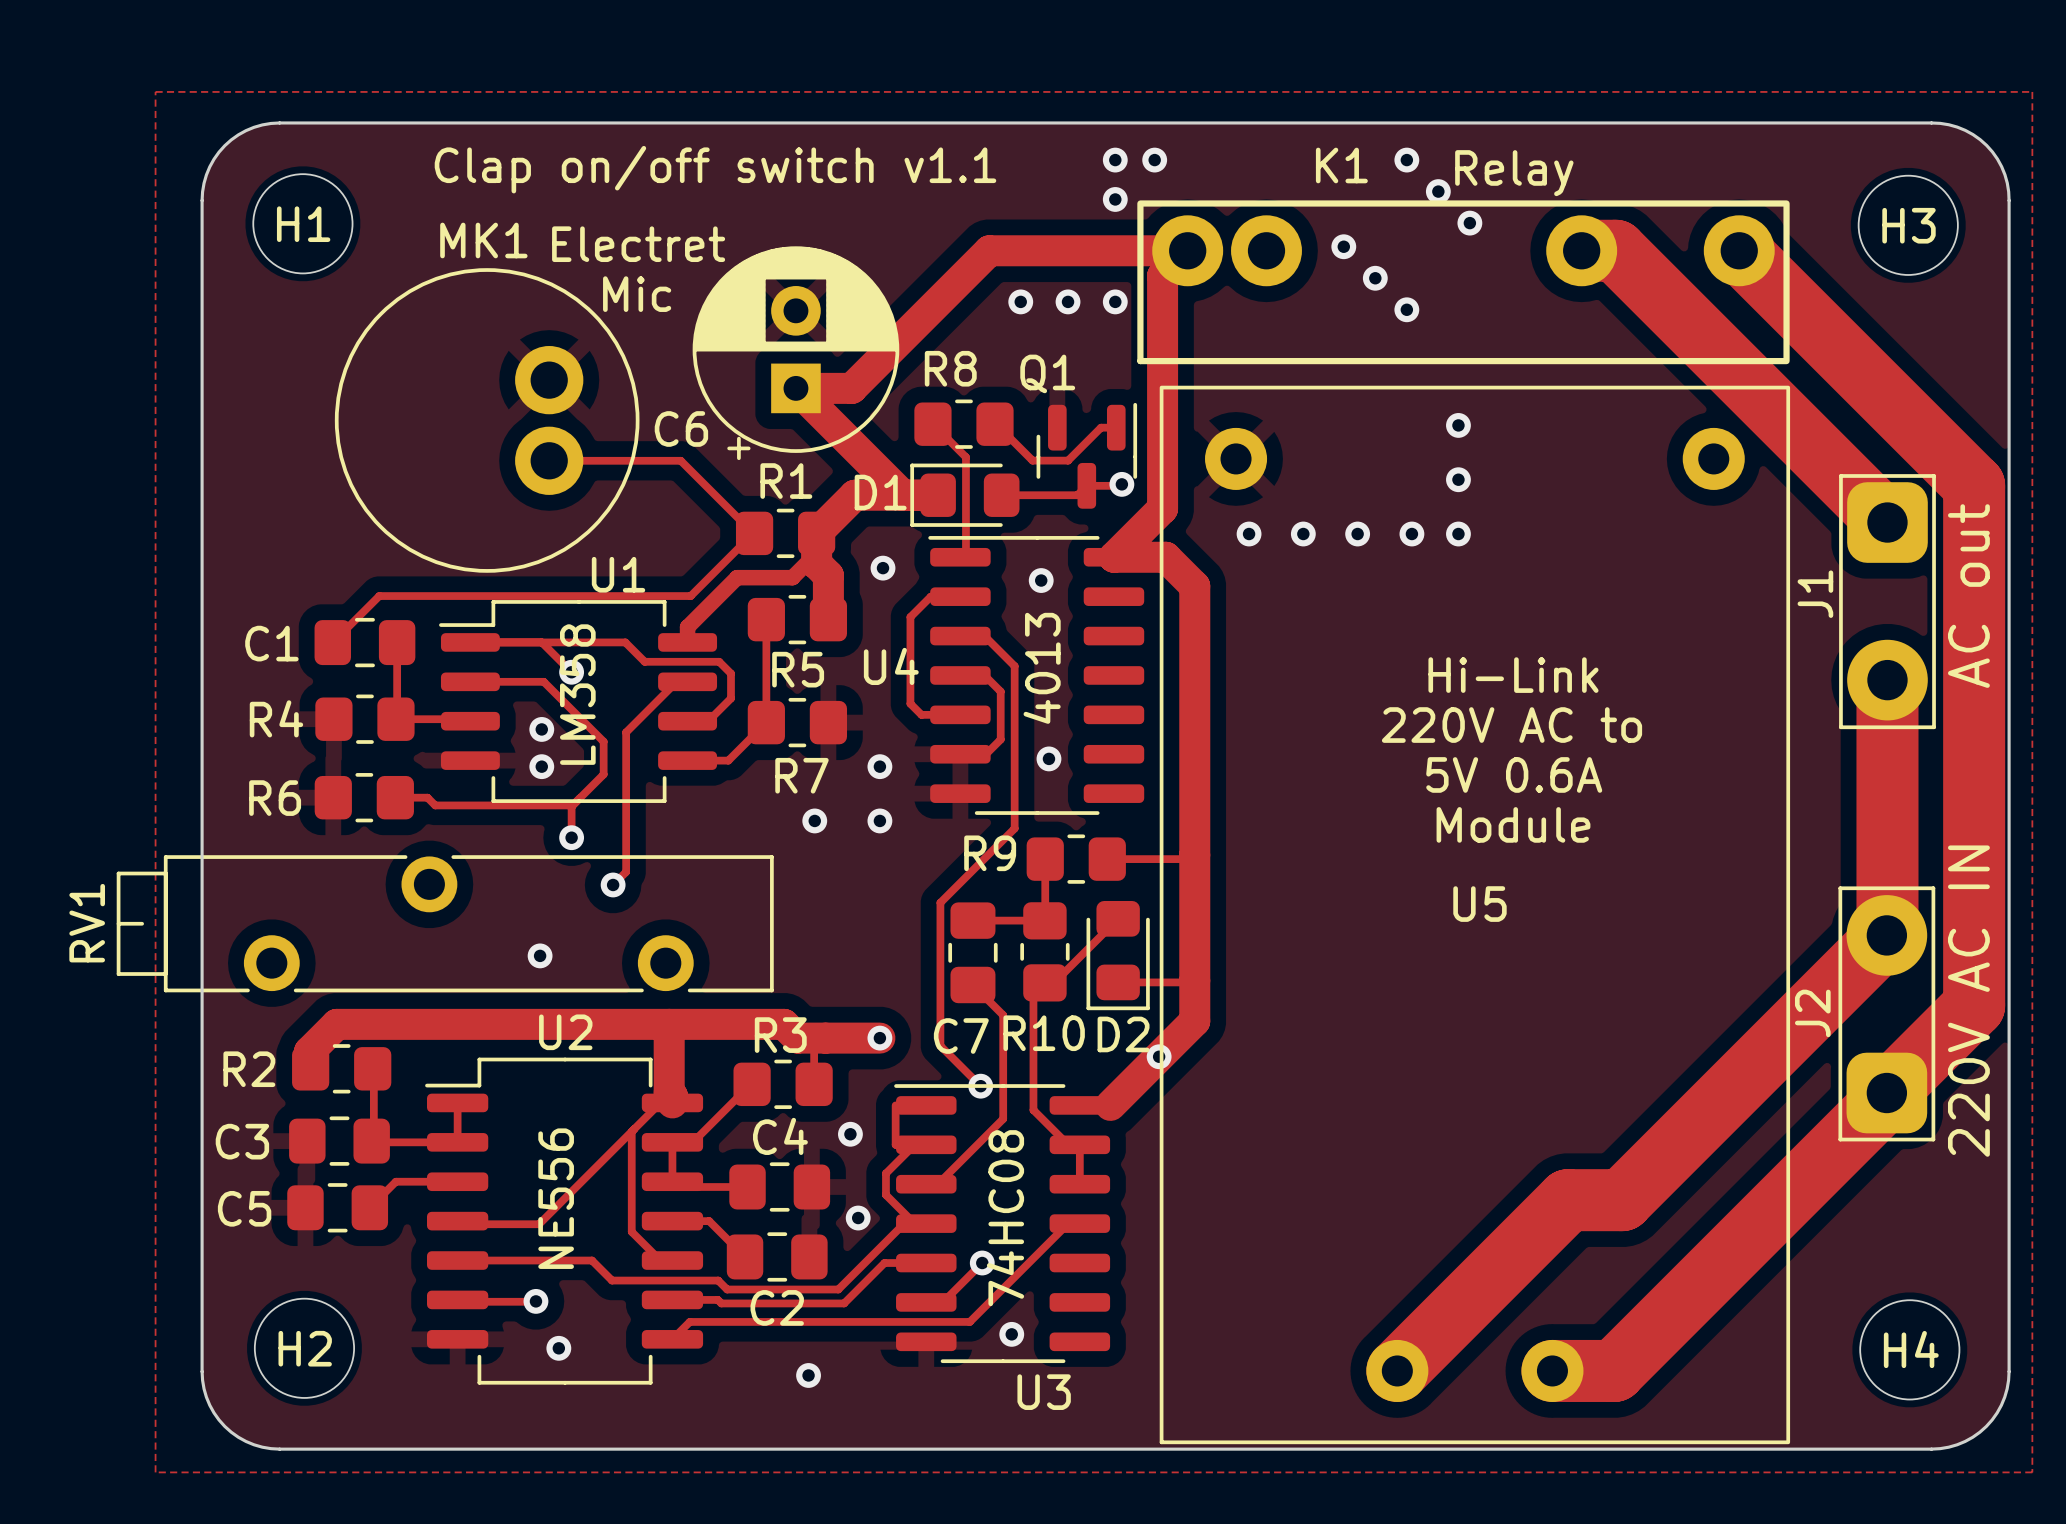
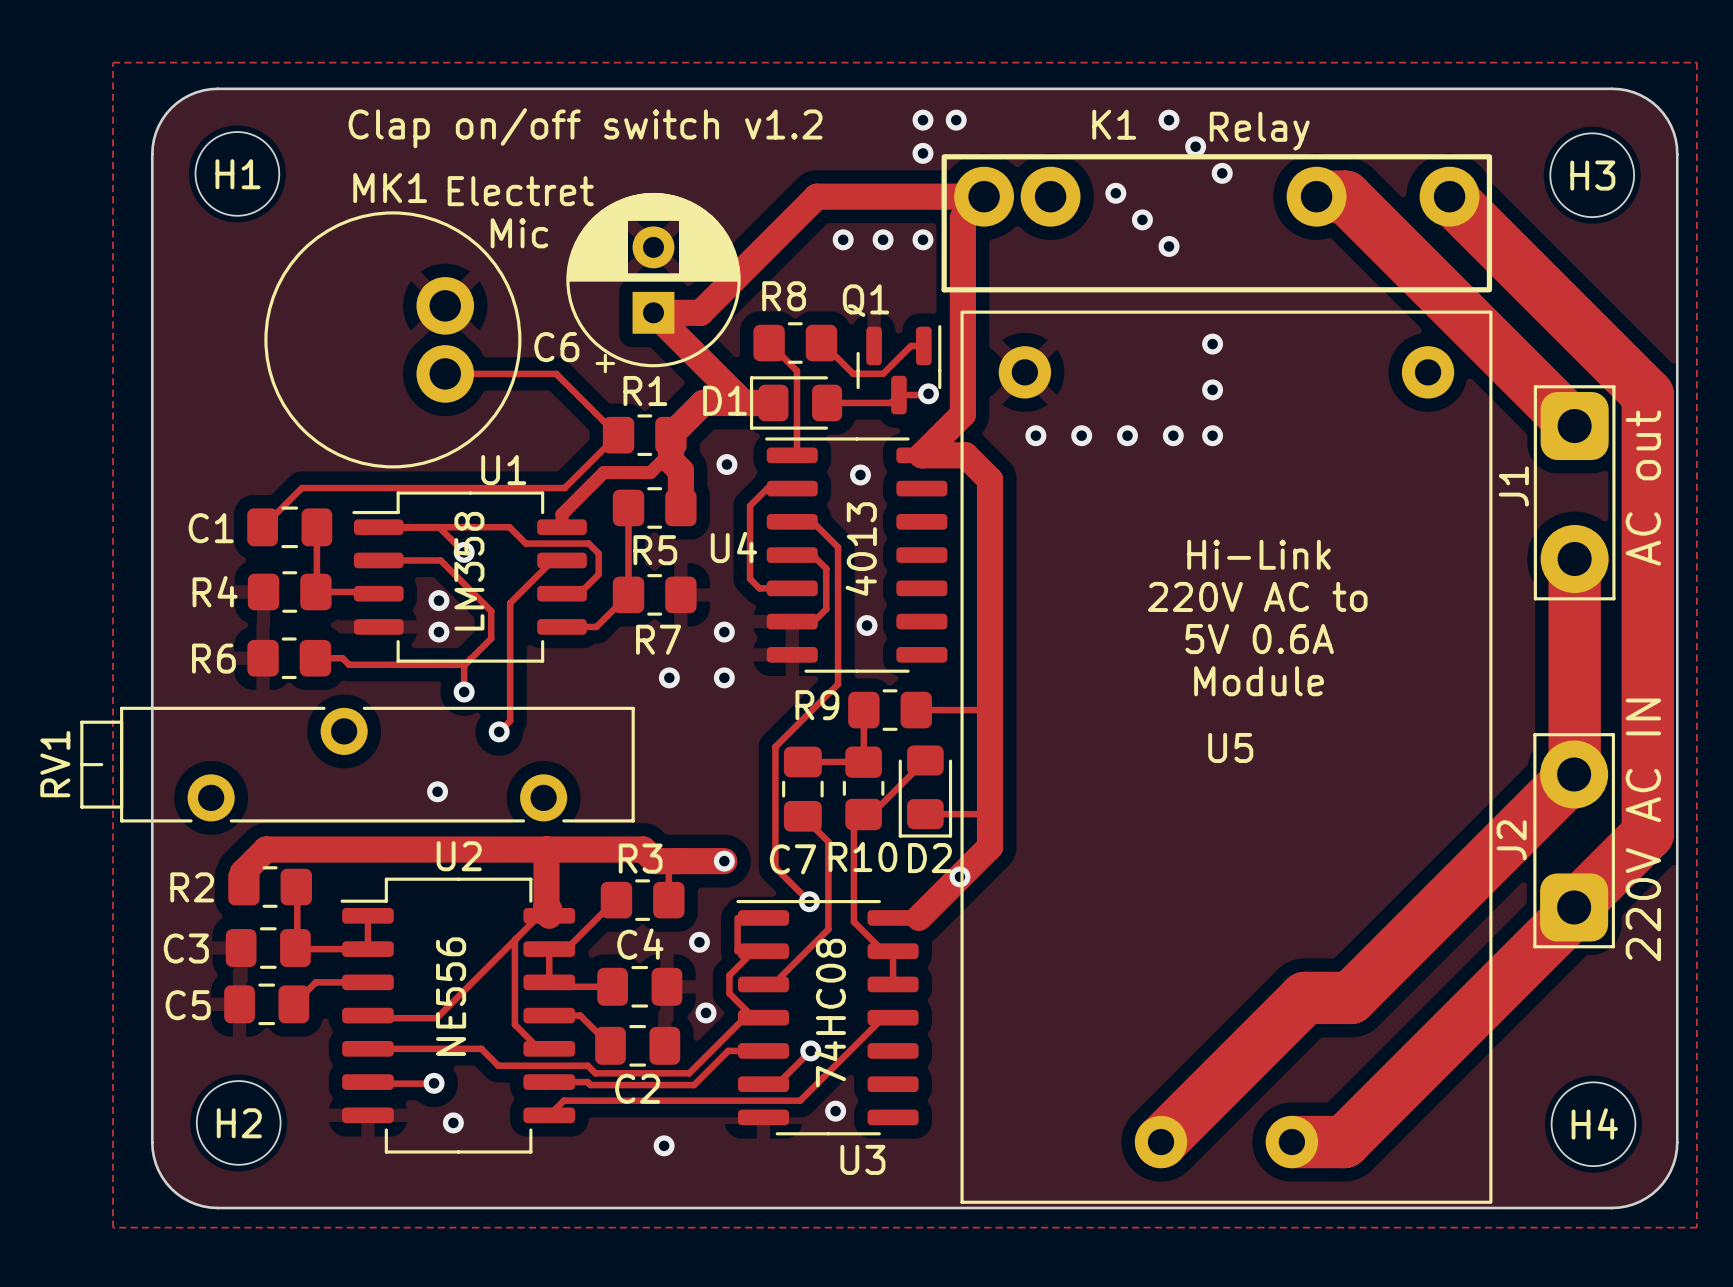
text: Clap on/off switch v1.1 (715, 169) -> Clap on/off switch v1.2 (585, 128)

